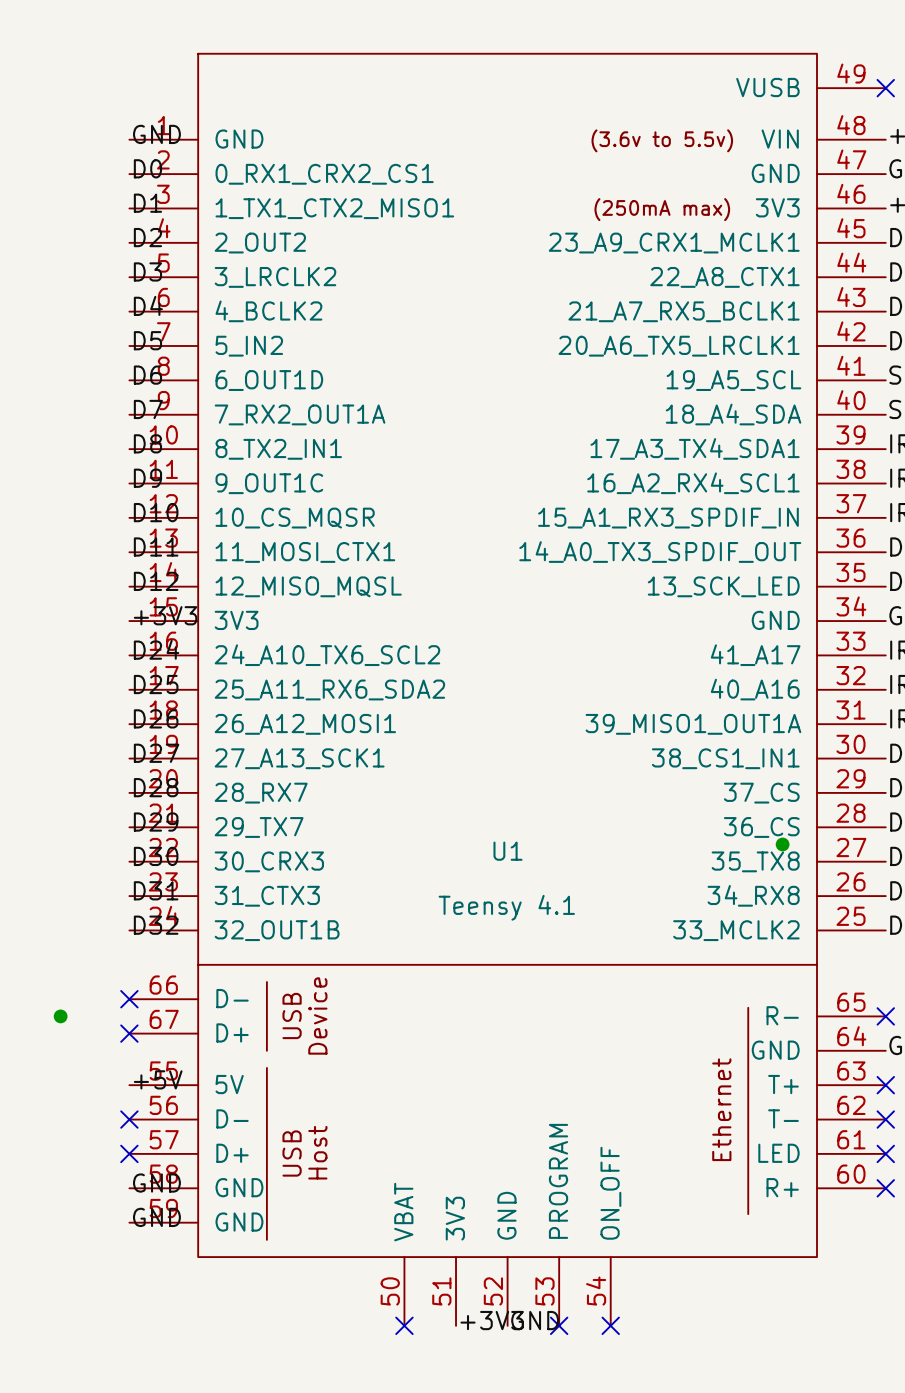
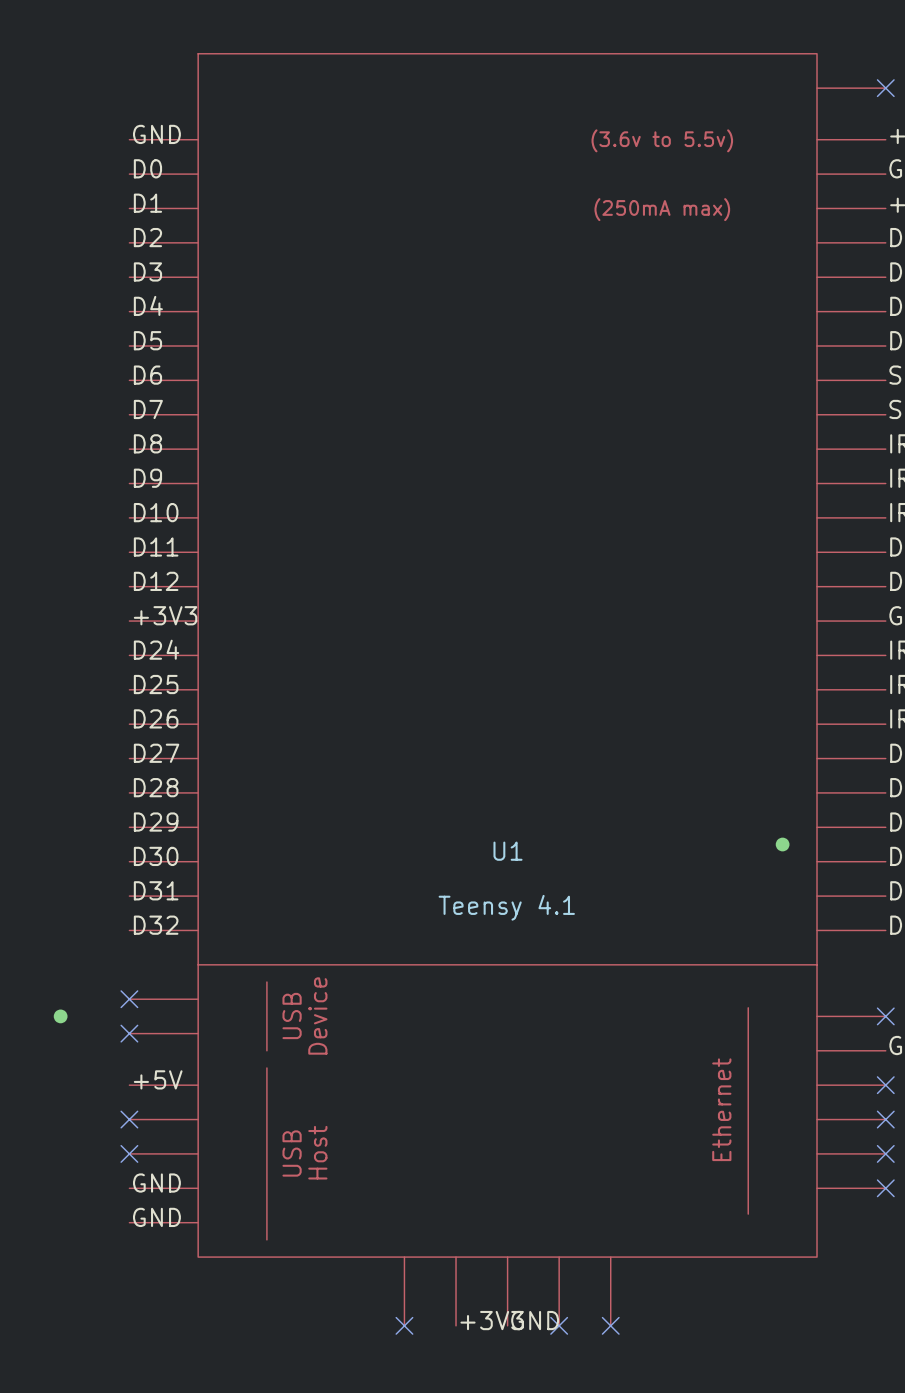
U1 symbol: [129, 53, 886, 1326] -> [129, 53, 886, 1326]

